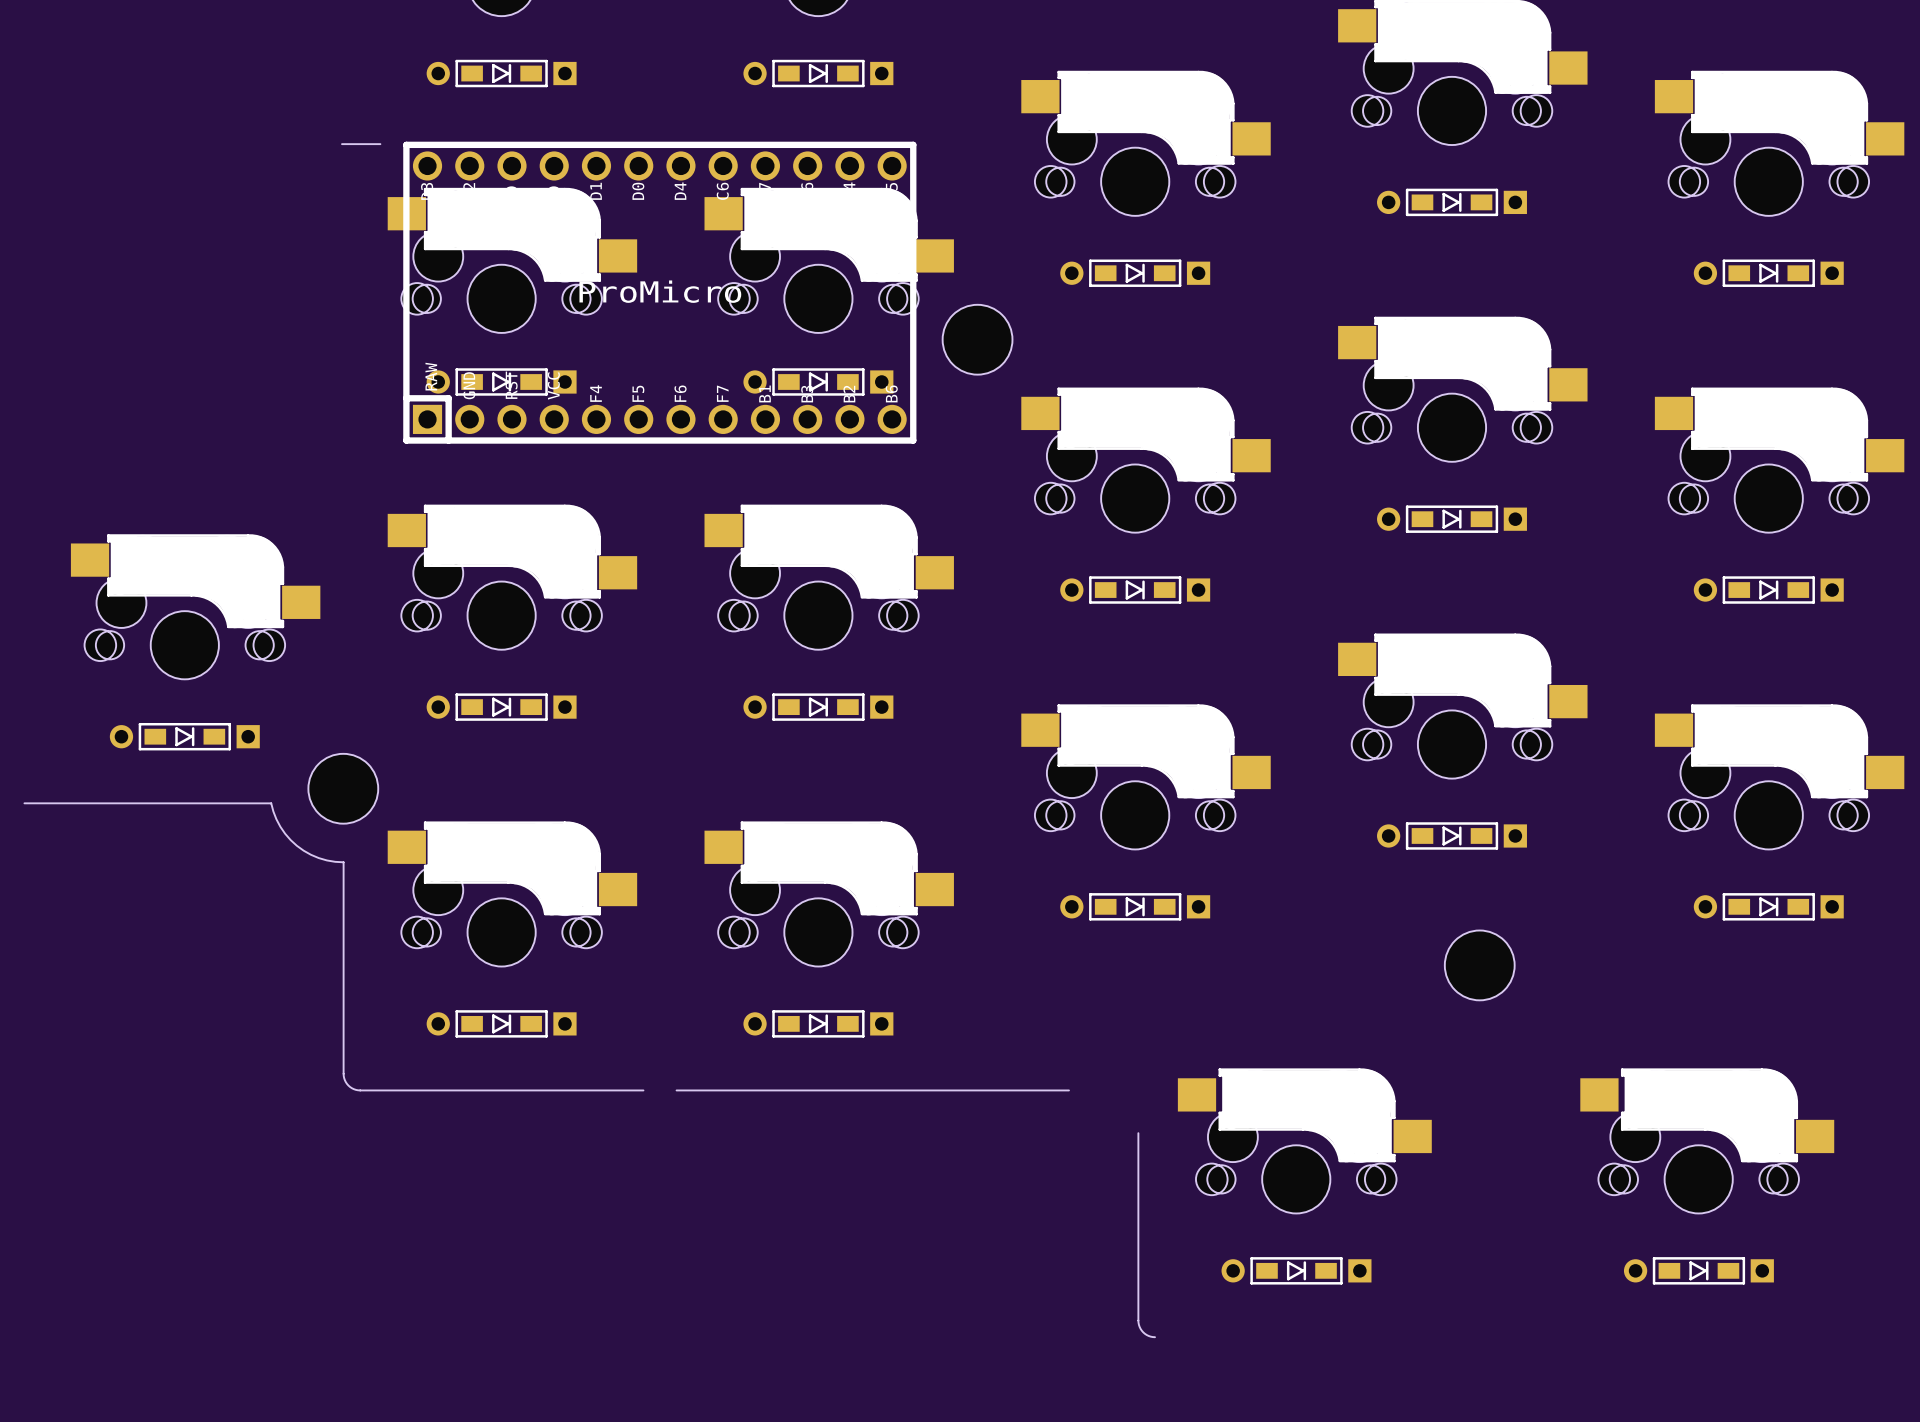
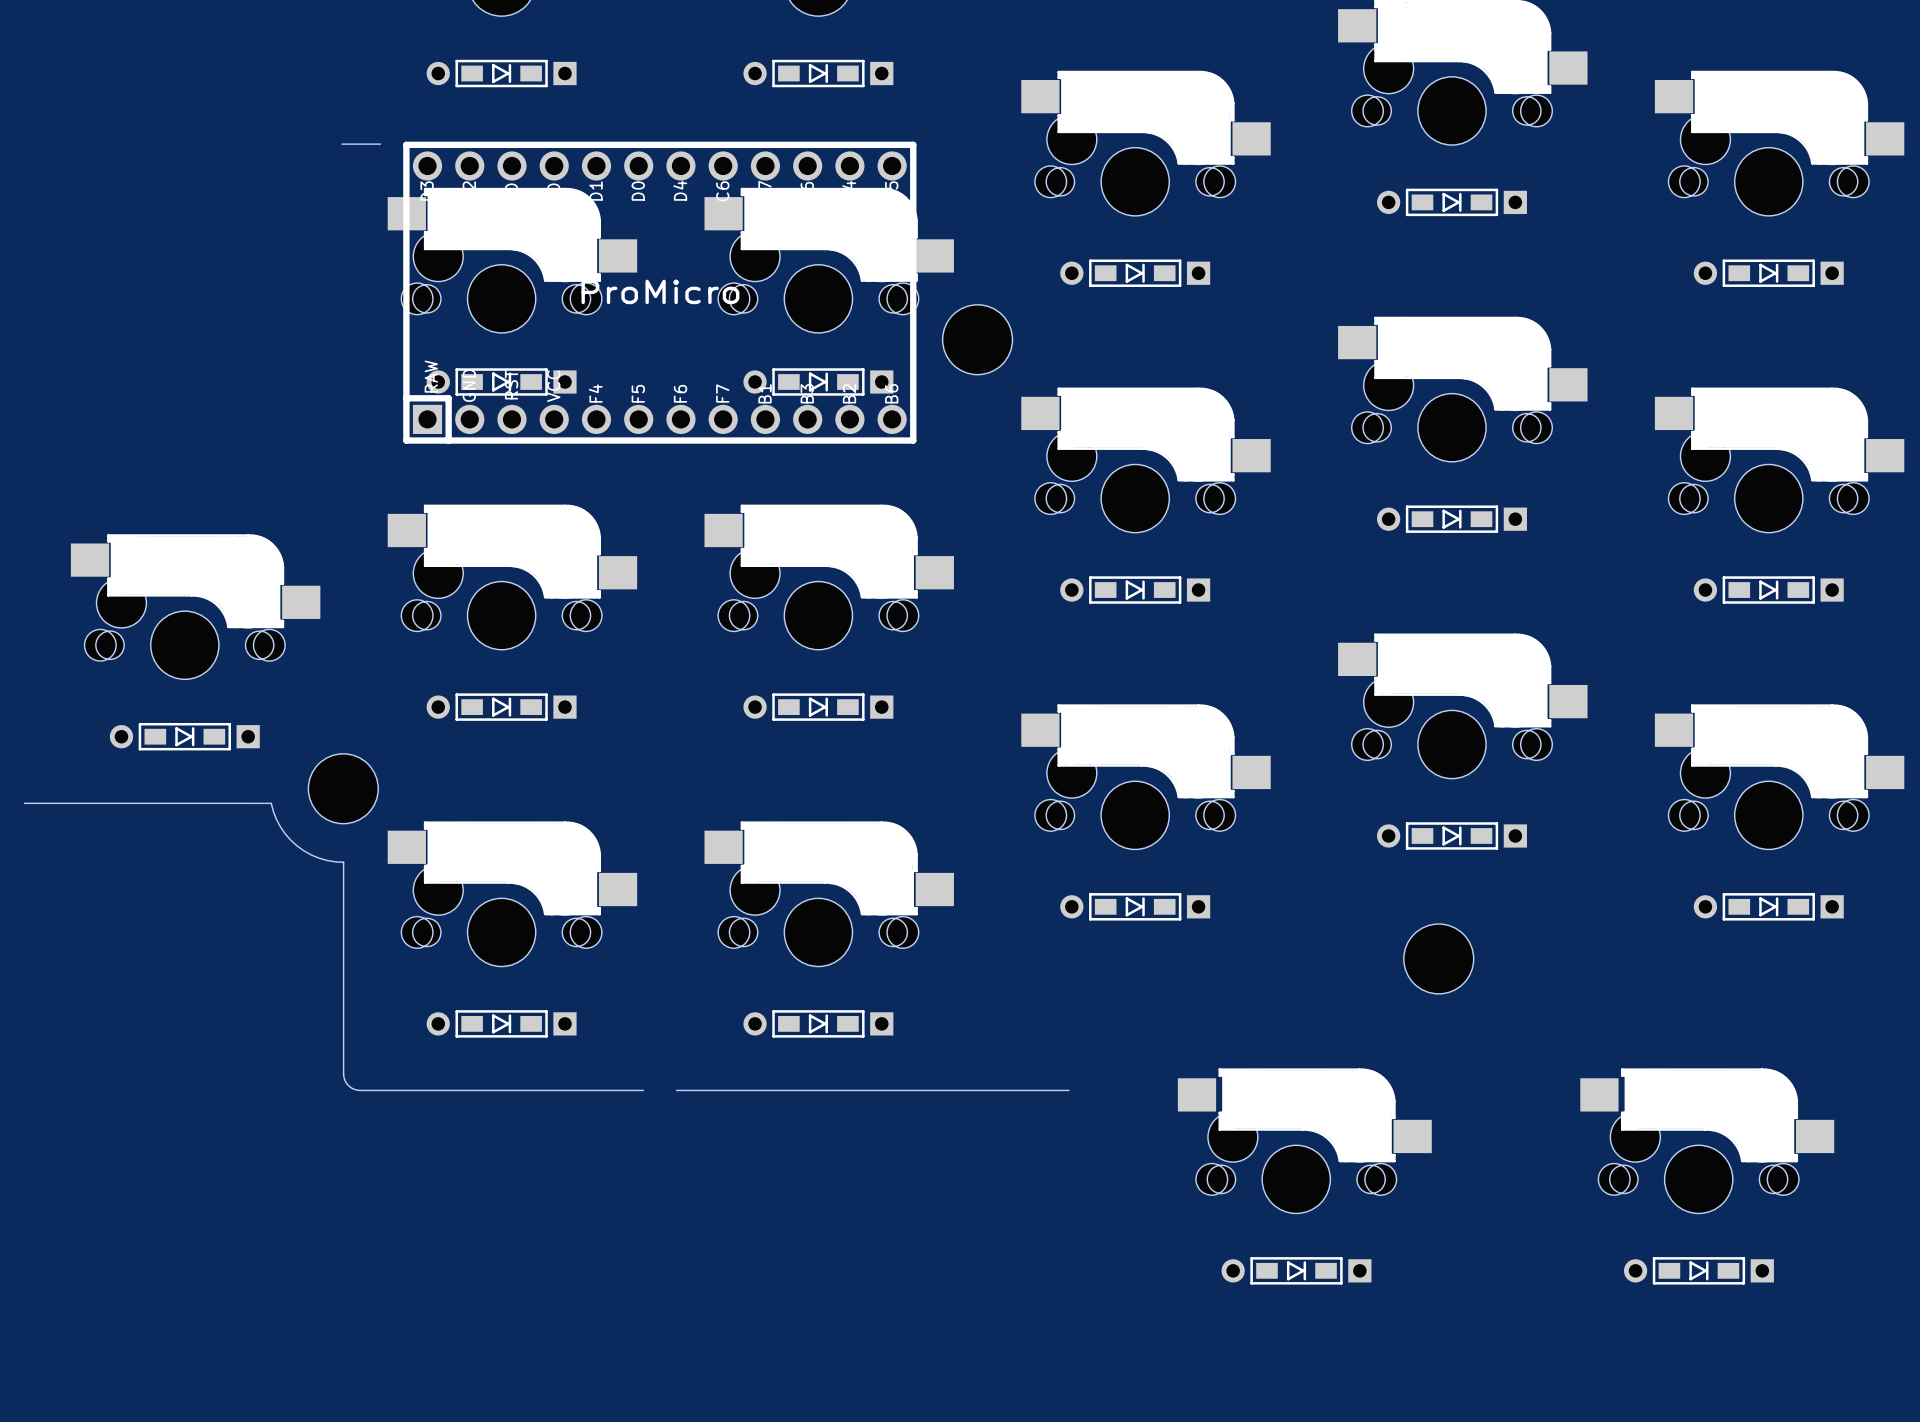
part position: (1479, 965) -> (1438, 958)
board edge: (1138, 1133) (1138, 1322) (1143, 1332) (1155, 1337) -> none

